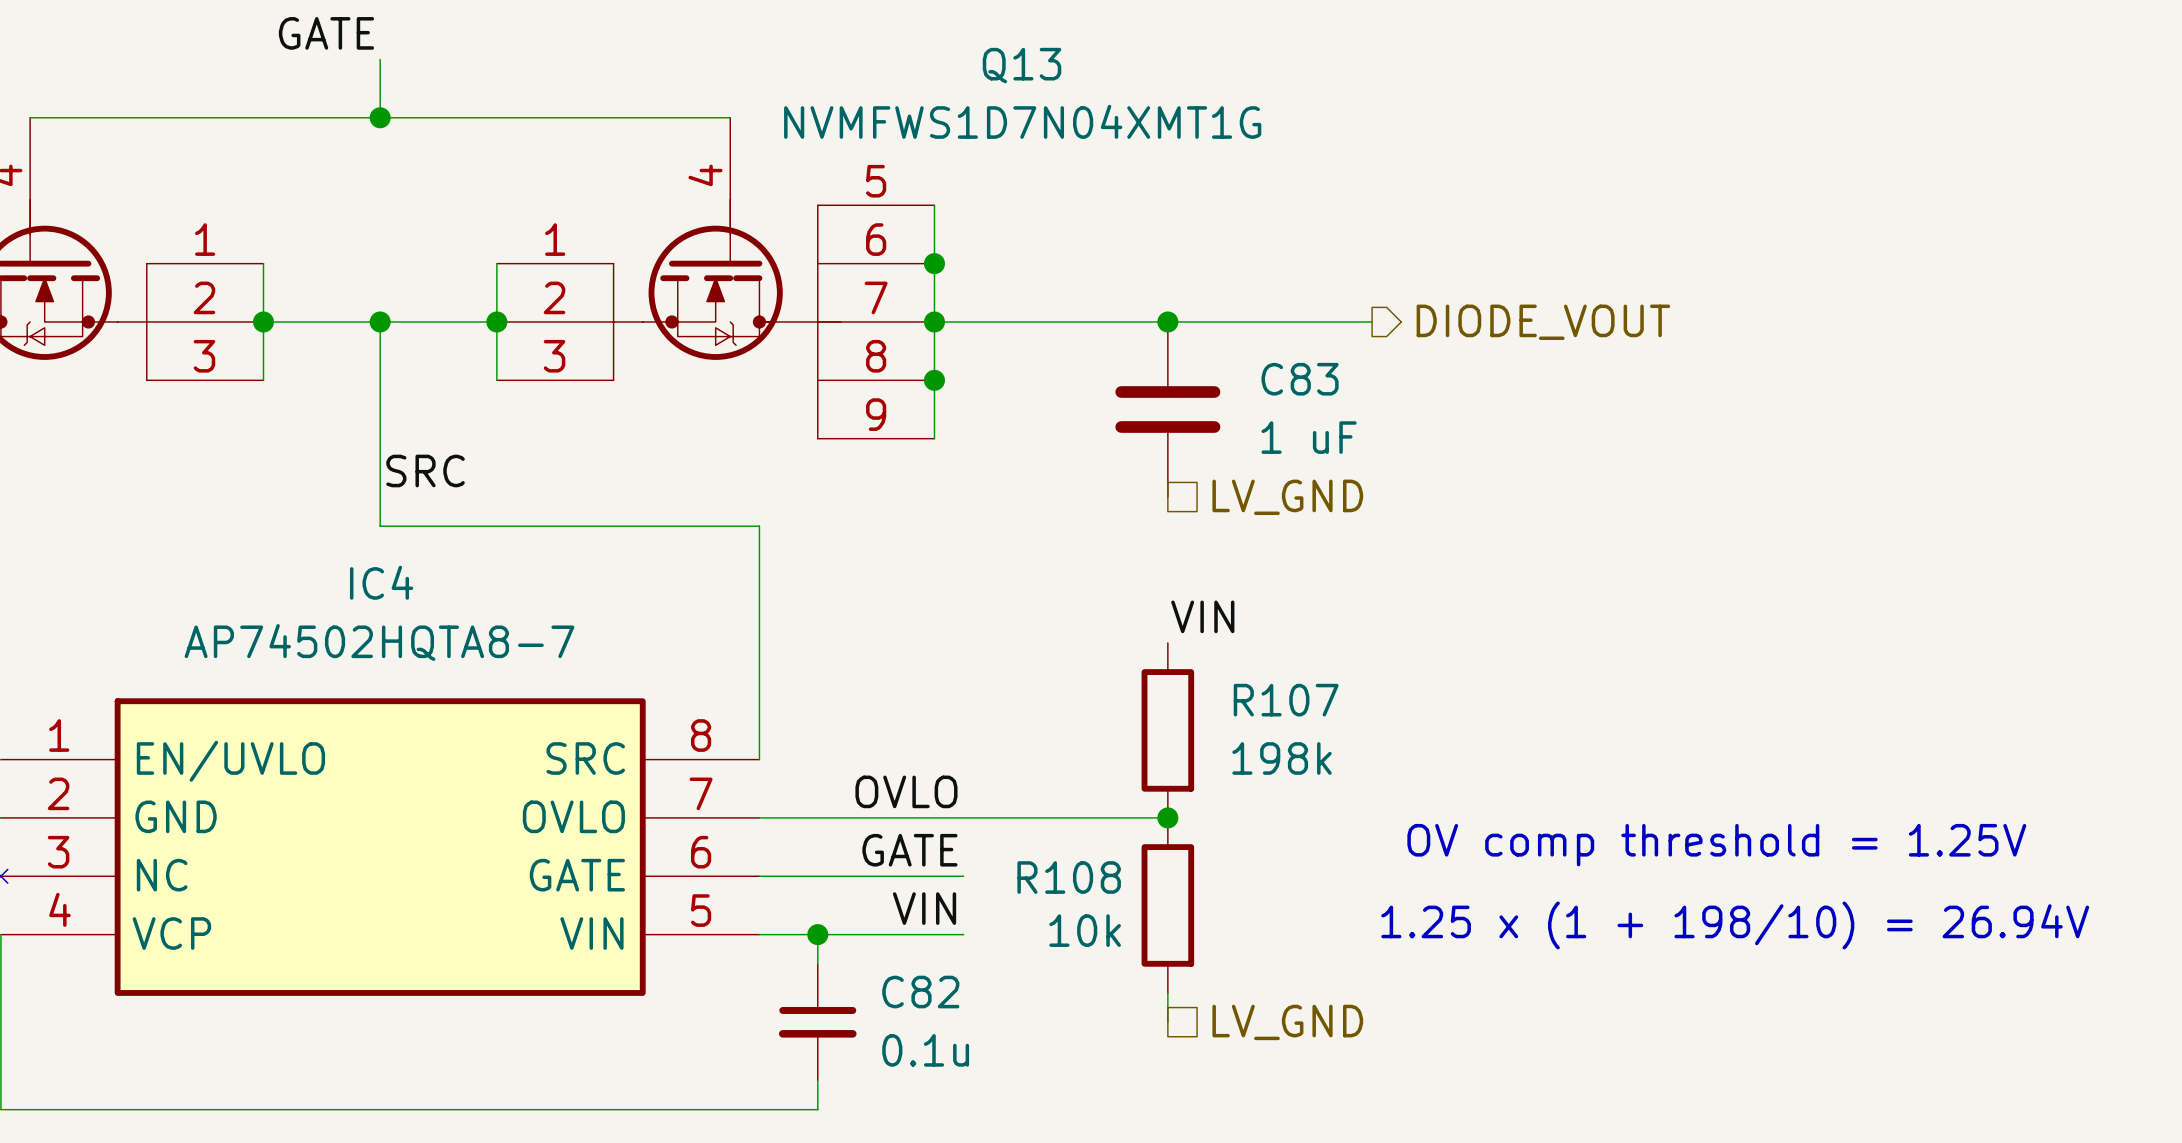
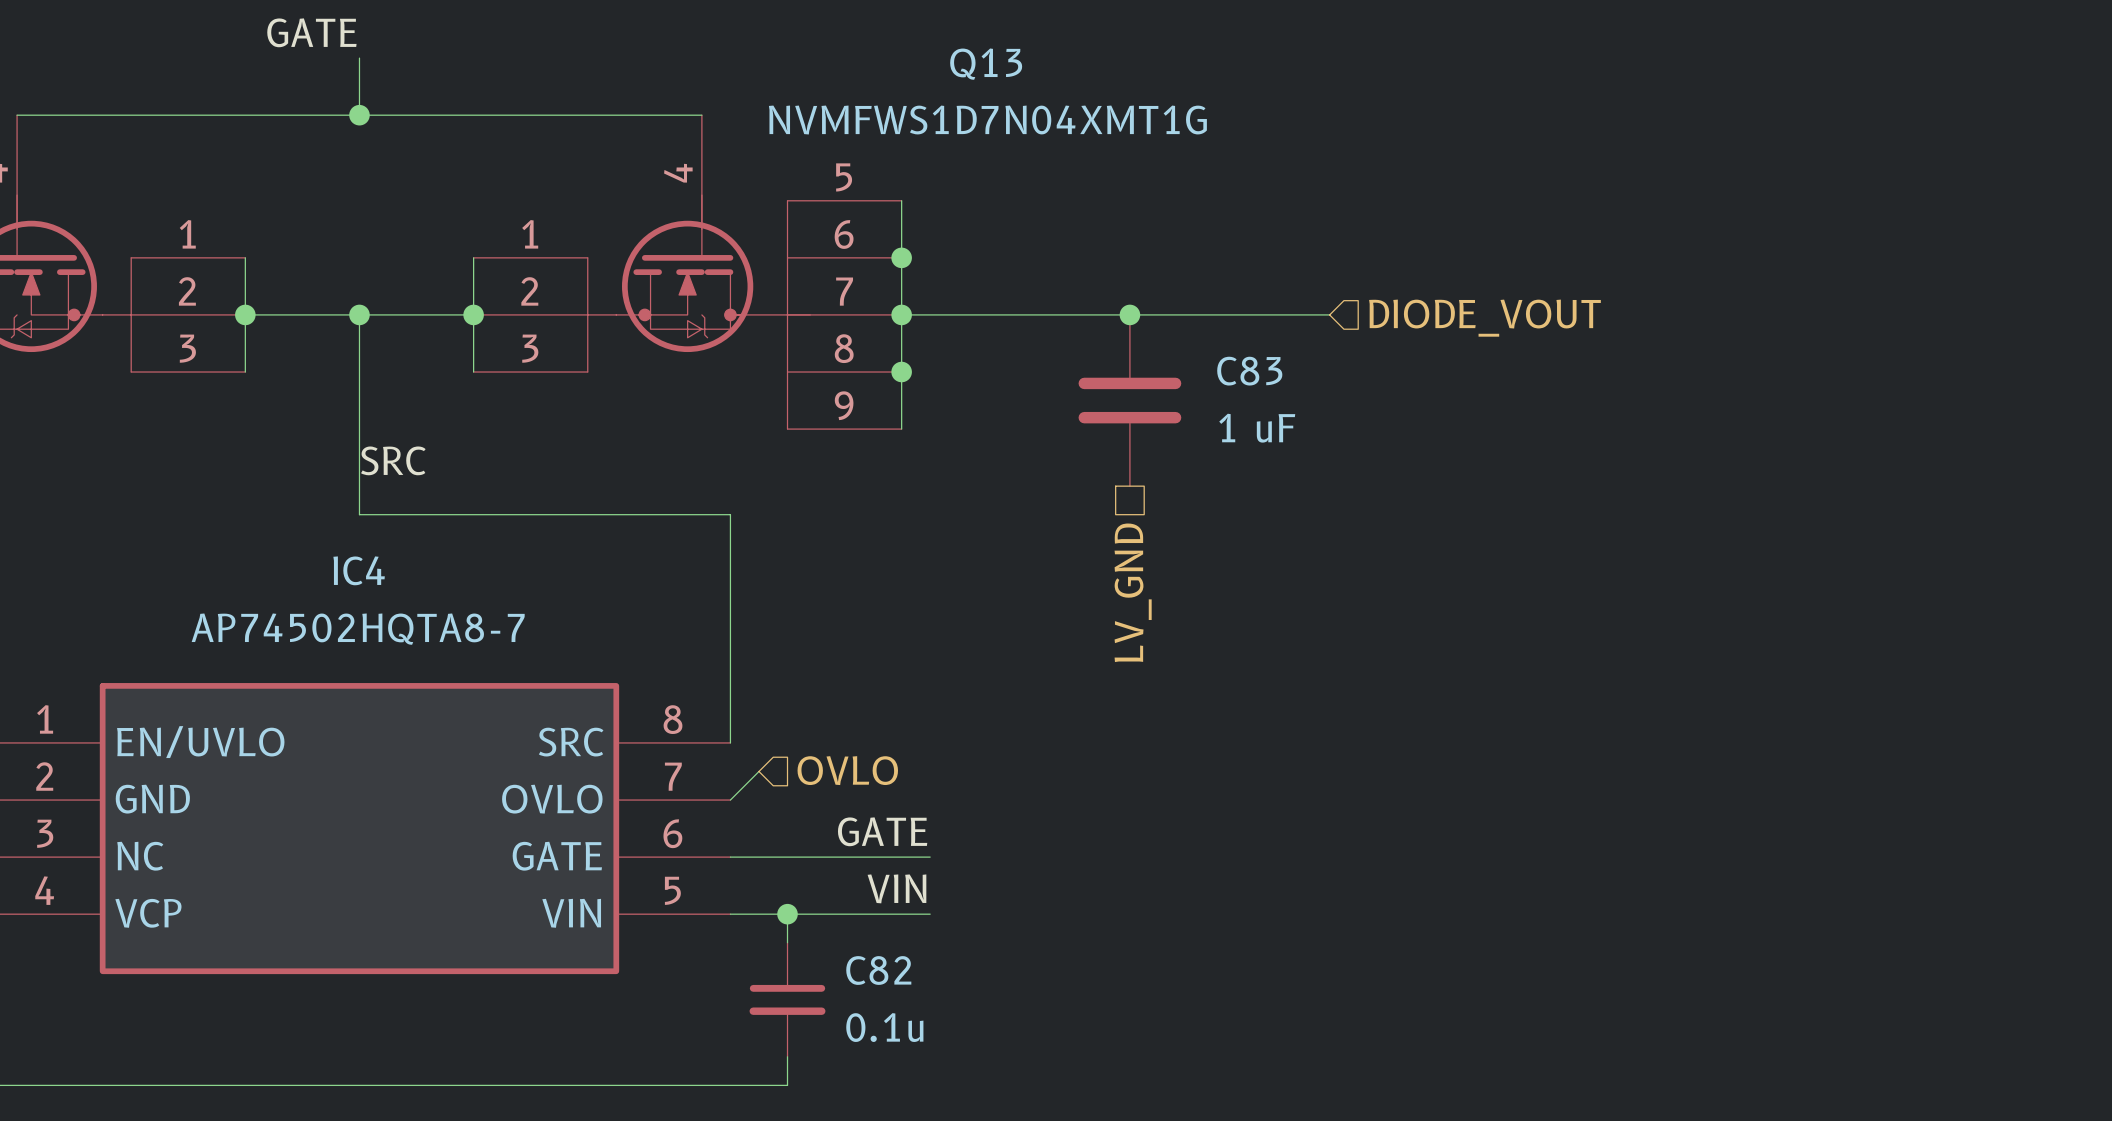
hierarchical label shape: output (1543, 322) -> input (1484, 318)
hierarchical label rotation: 0° (1287, 497) -> 90° clockwise (1133, 592)
label: VIN (1202, 616) -> none
R107: 198k (1167, 730) -> none
hierarchical label: none -> OVLO (847, 770)
label: OVLO (906, 791) -> none
wire: (759, 817) (1167, 817) -> (730, 800) (758, 771)
junction: (1167, 817) -> none
text: OV comp threshold = 1.25V (1716, 845) -> none
R108: 10k (1167, 905) -> none
text: 1.25 x (1 + 198/10) = 26.94V (1735, 925) -> none
wire: (1167, 992) (1167, 1022) -> none
hierarchical label: LV_GND (1287, 1022) -> none

